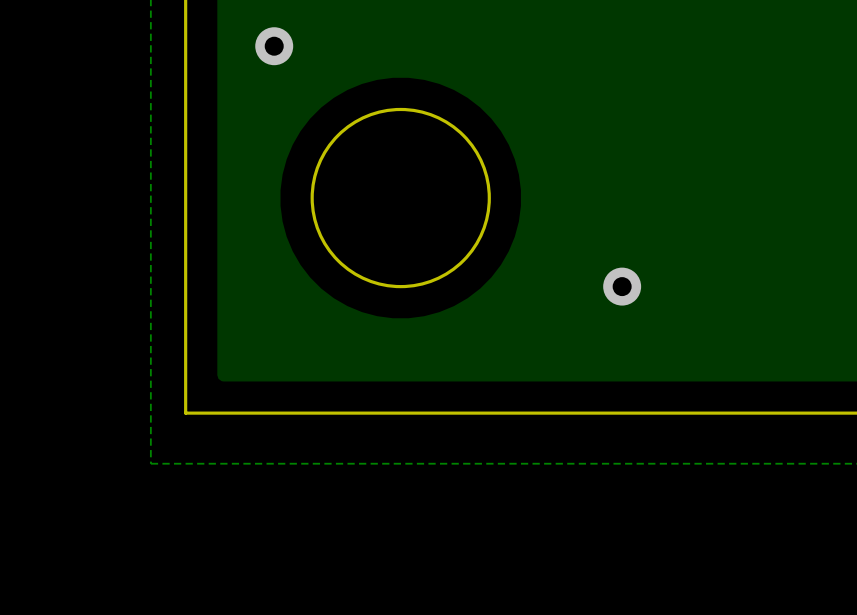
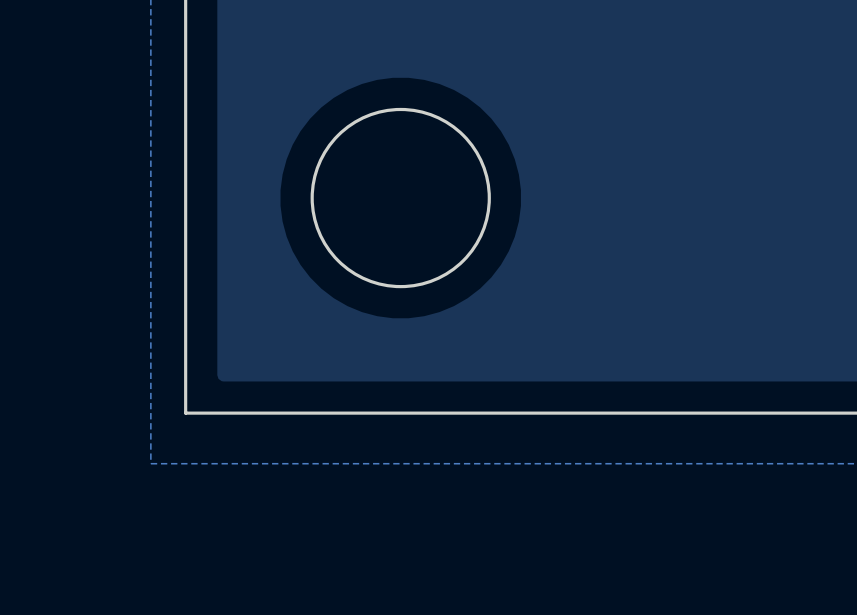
via: (274, 46) -> none
via: (622, 286) -> none

